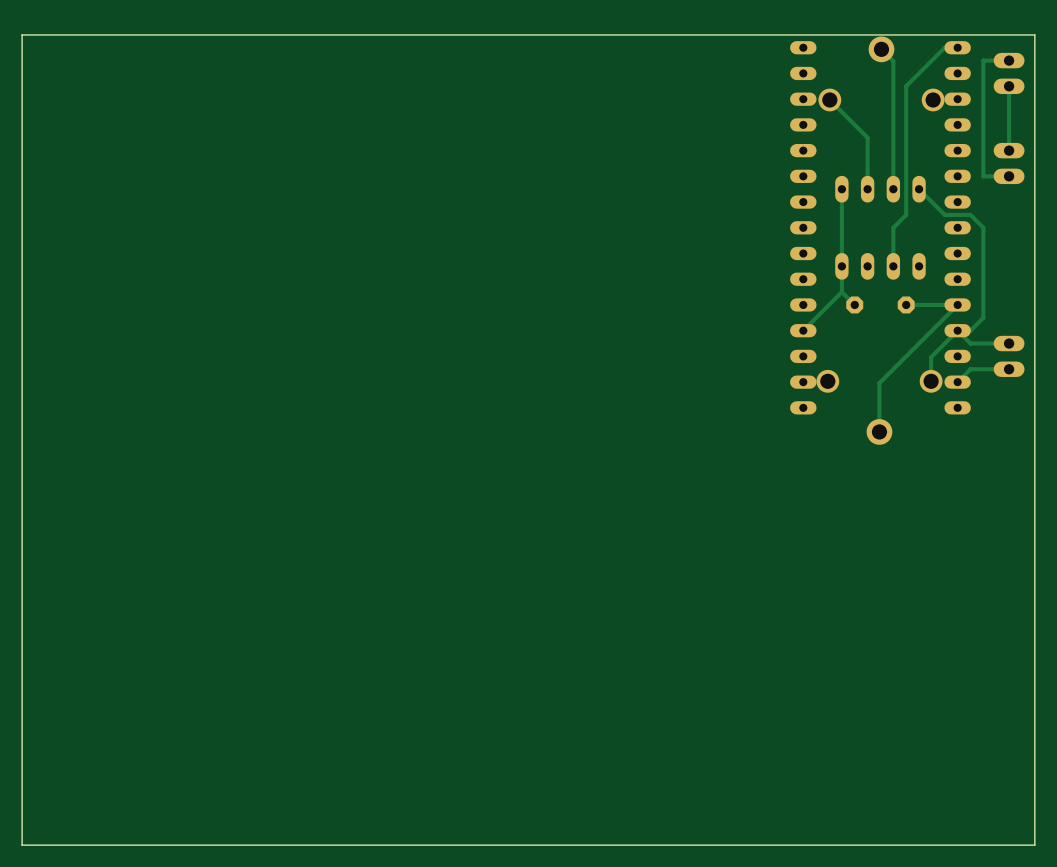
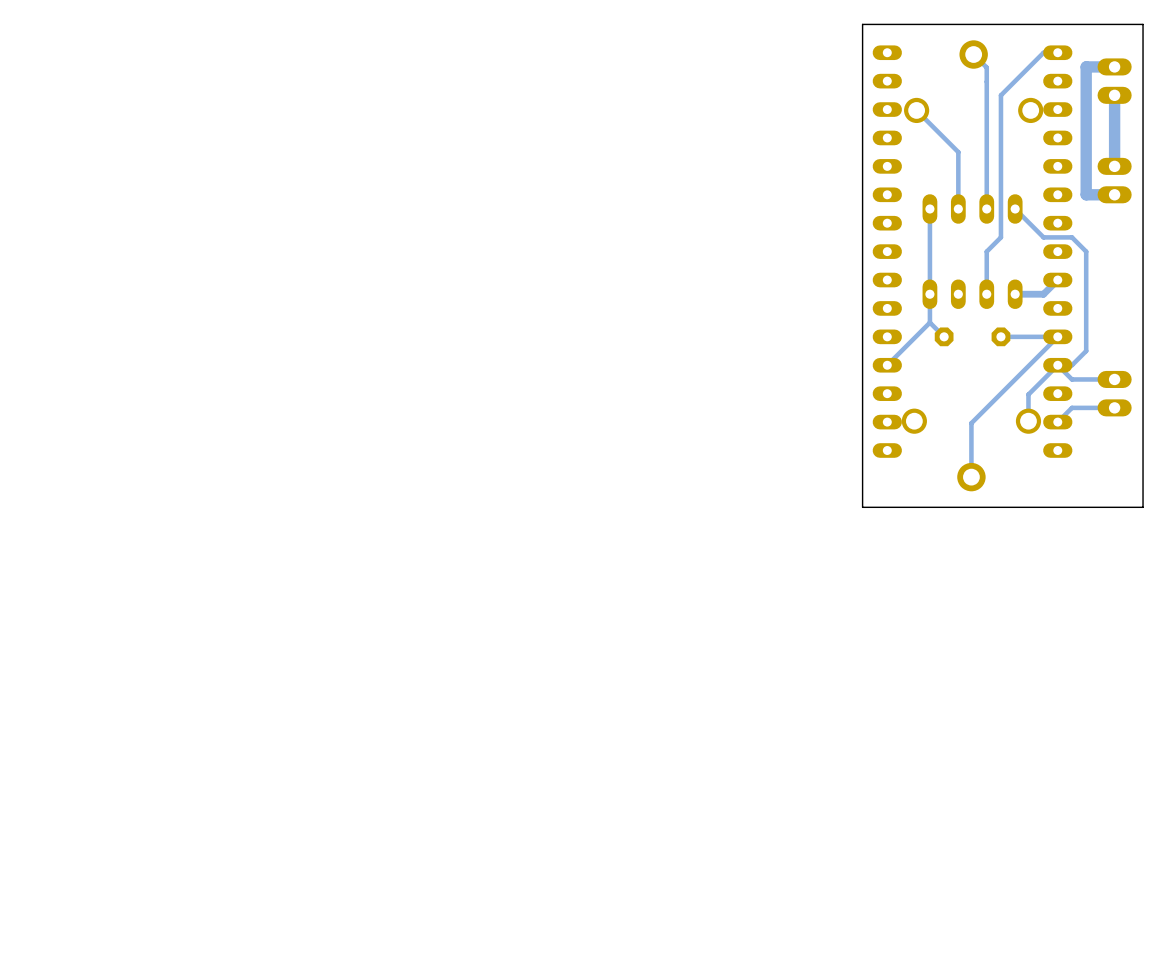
board edge: (1034, 34) (22, 34) (22, 845) (1034, 845) (1034, 459) -> (1143, 38) (1143, 24) (862, 24) (862, 507) (1143, 507)
track width: thin (1009, 60) (983, 60) (983, 176) (1009, 176) -> thick (1114, 66) (1086, 66) (1086, 194) (1114, 194)
track width: thin (1009, 86) (1009, 150) -> thick (1114, 95) (1114, 166)
track: none -> (1057, 280) (1043, 294) (1015, 294)

